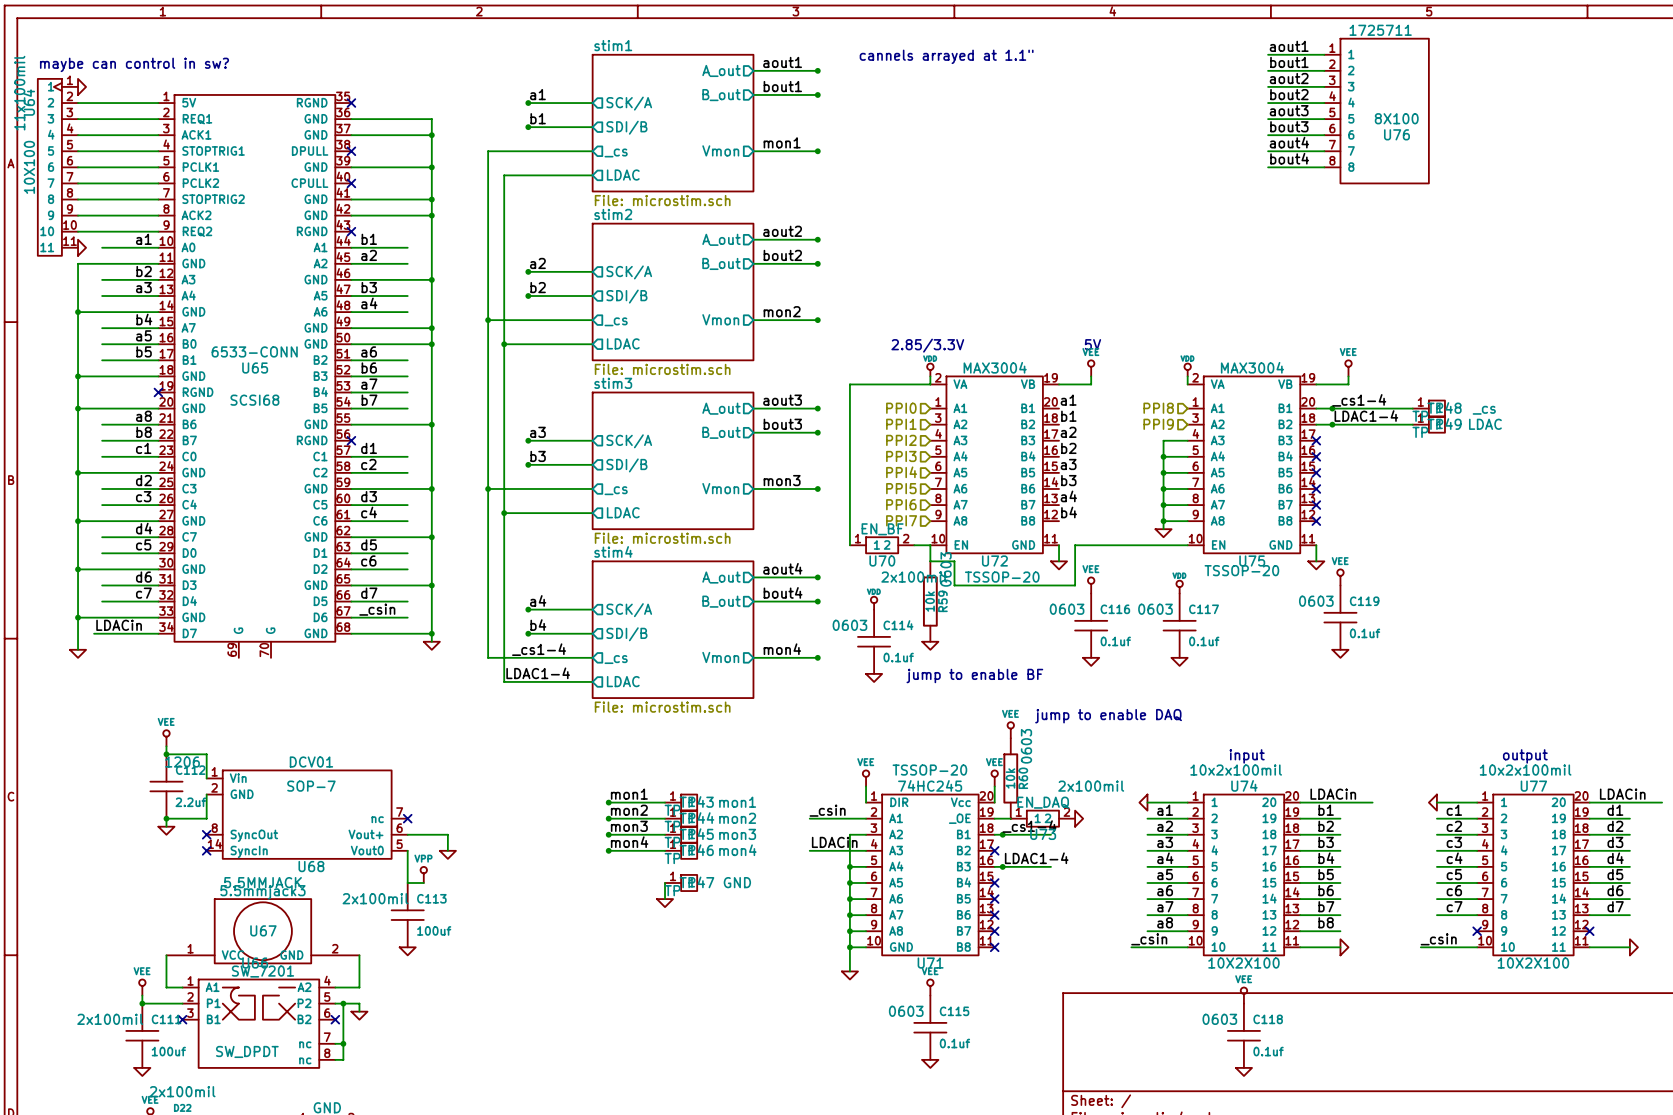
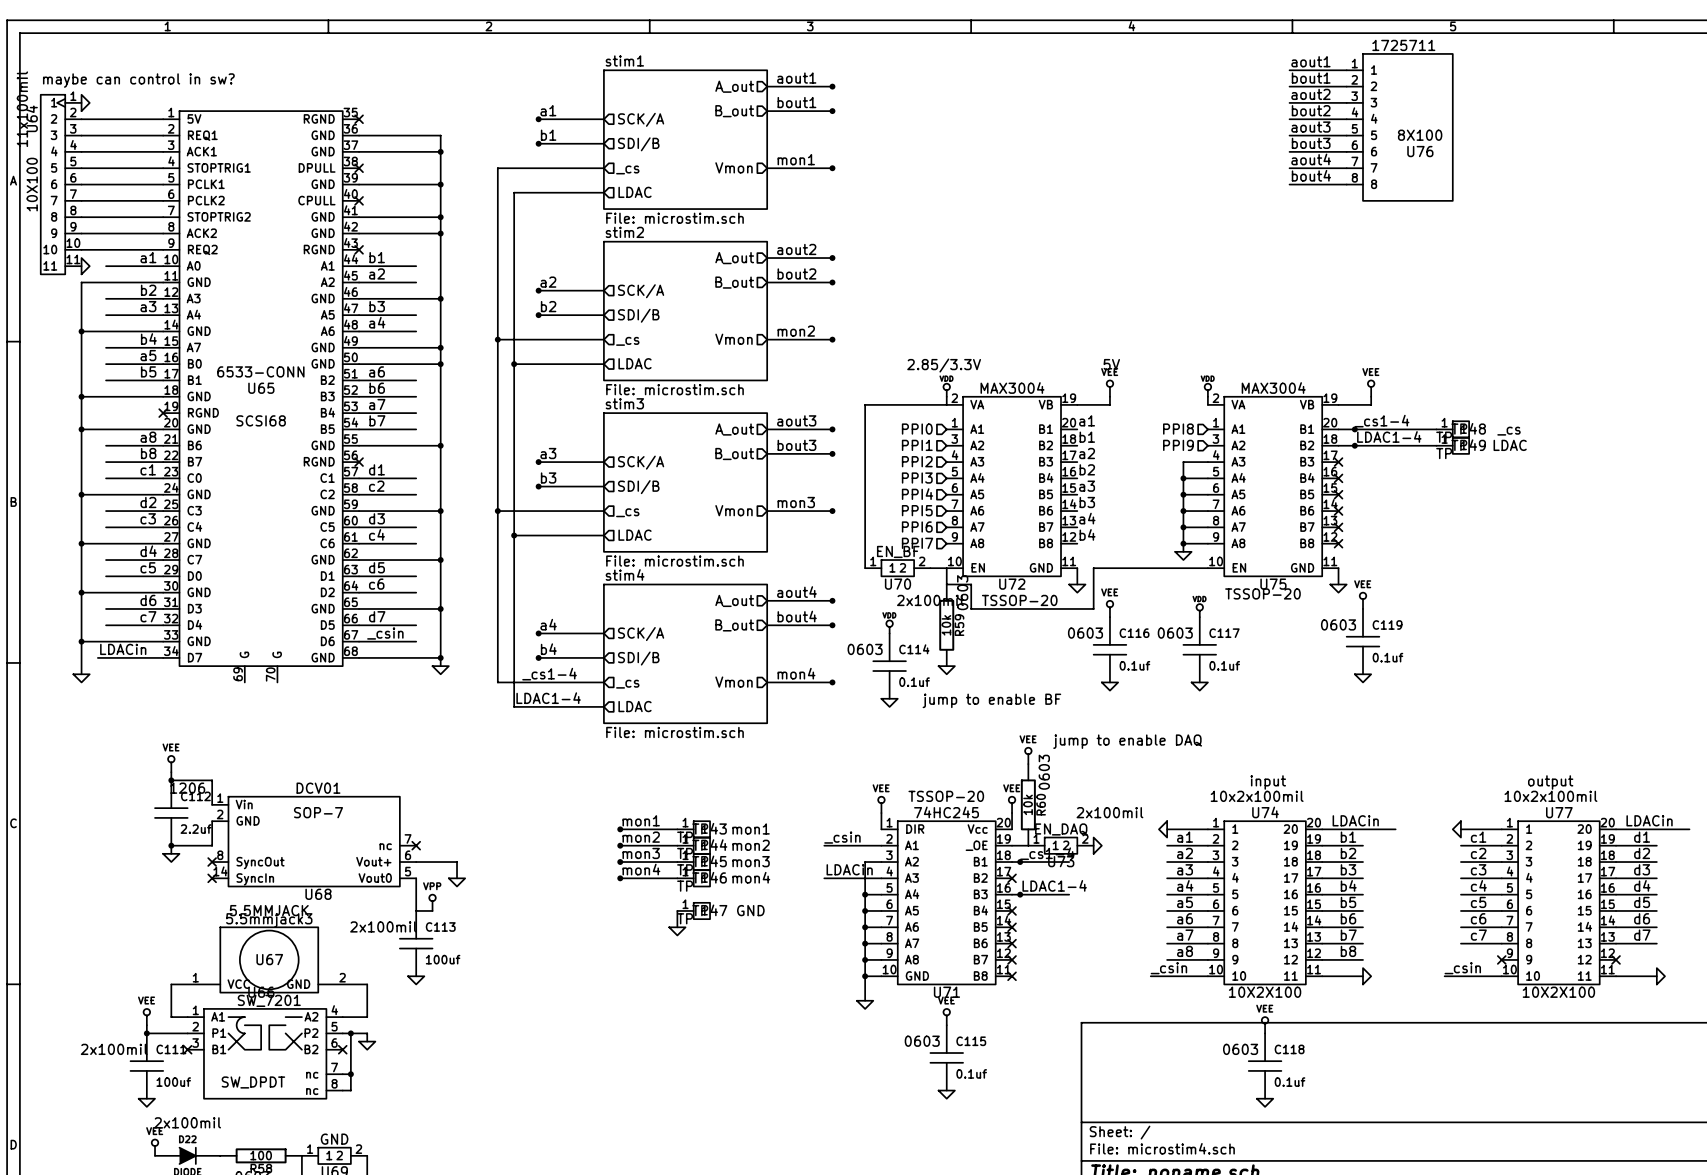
text: cannels arrayed at 1.1" (946, 56) -> none

